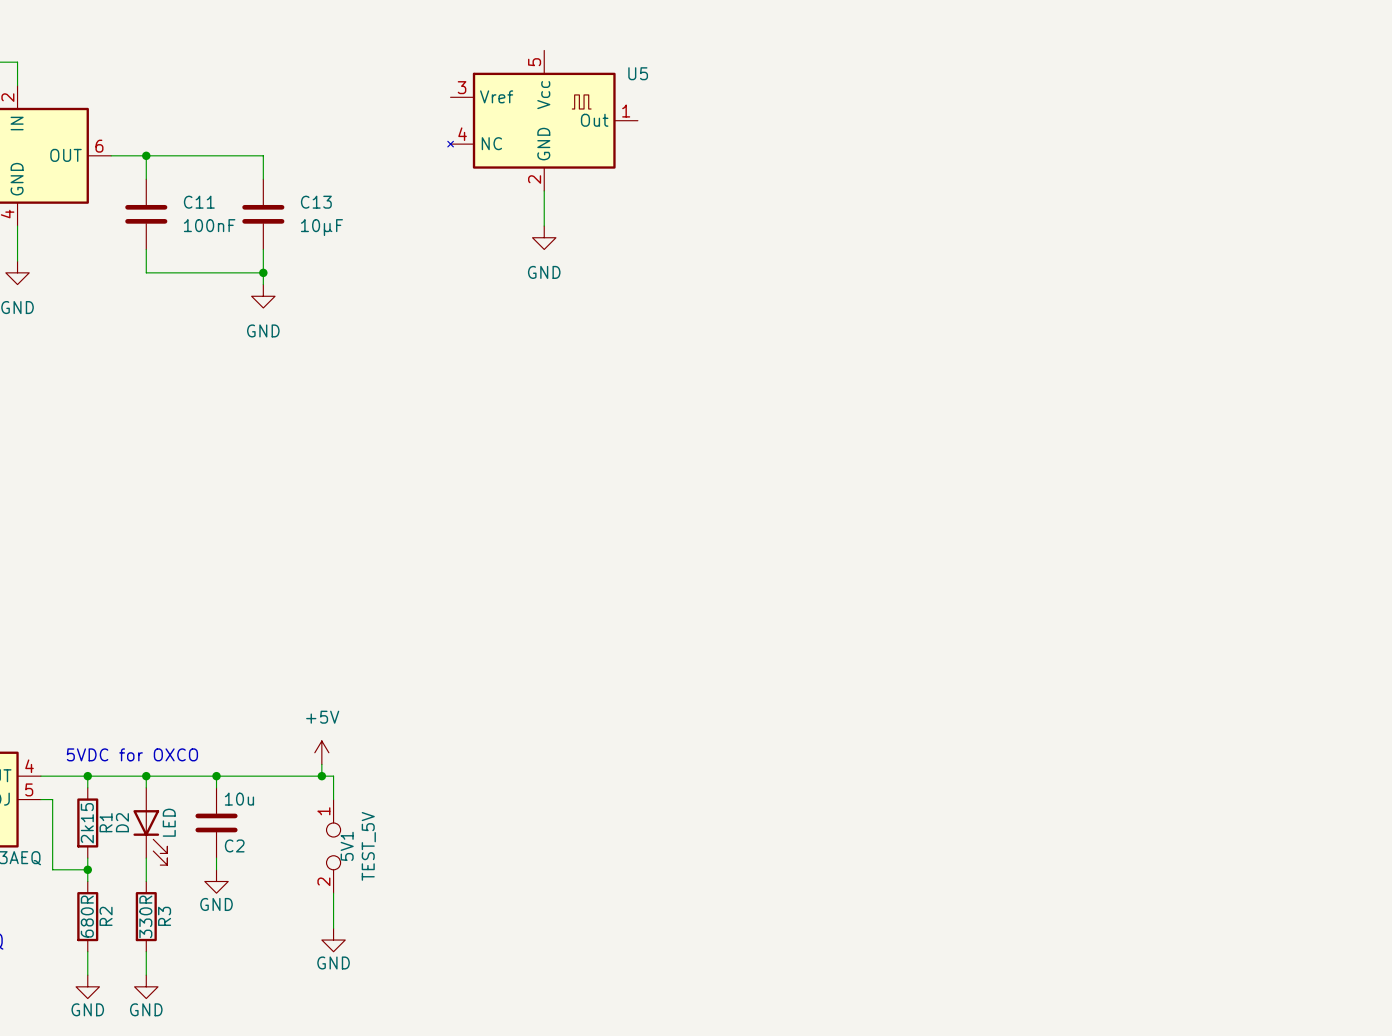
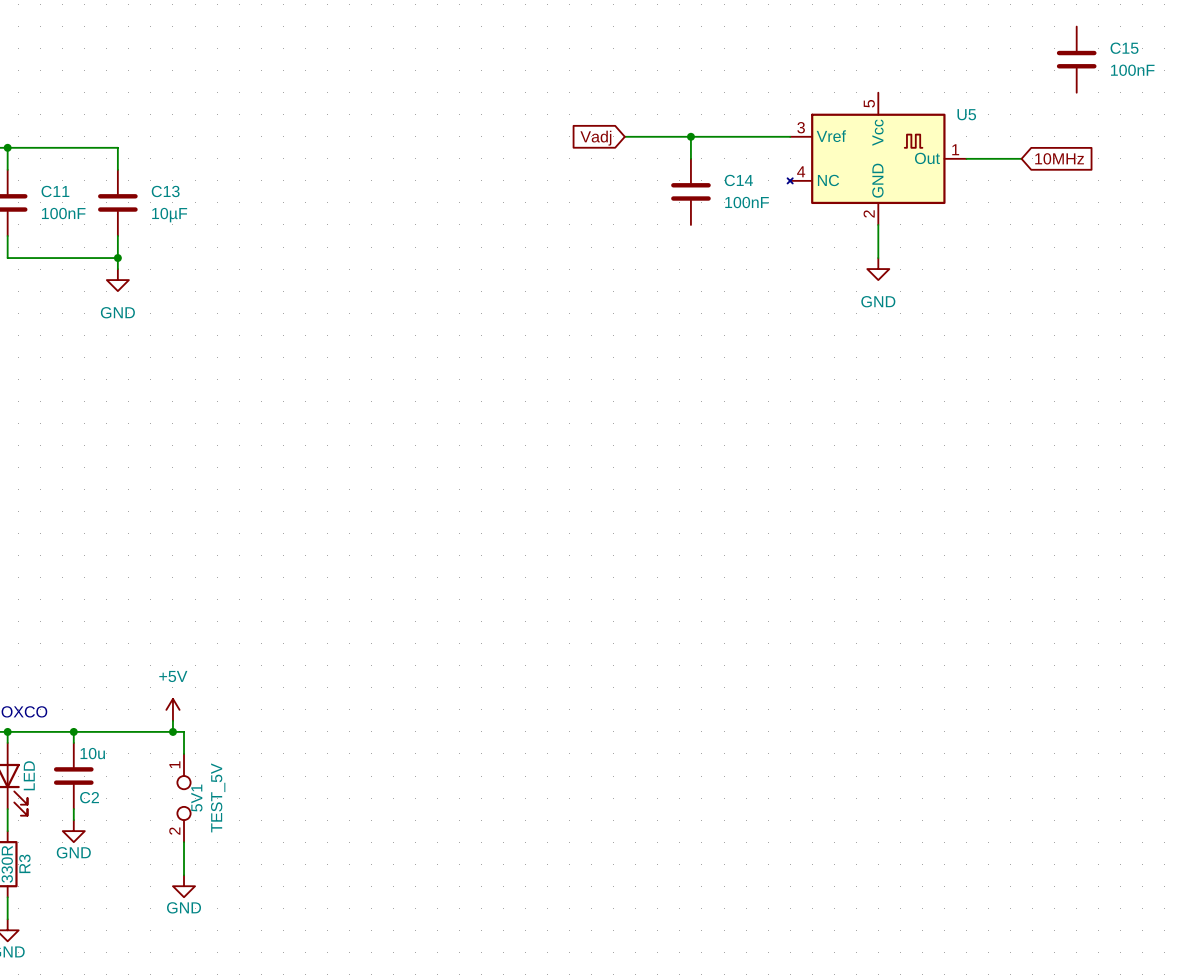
C15: none -> 100nF (1076, 59)
U5 position: (542, 120) -> (877, 158)
wire: none -> (624, 136) (790, 136)
wire: none -> (690, 136) (690, 158)
junction: none -> (690, 136)
global label: none -> Vadj (595, 138)
wire: none -> (966, 158) (1021, 158)
global label: none -> 10MHz (1059, 158)
wire: (544, 190) (544, 226) -> none
C14: none -> 100nF (690, 191)
power symbol: GND (544, 237) -> none
wire: none -> (878, 224) (878, 258)
power symbol: none -> GND (878, 269)

